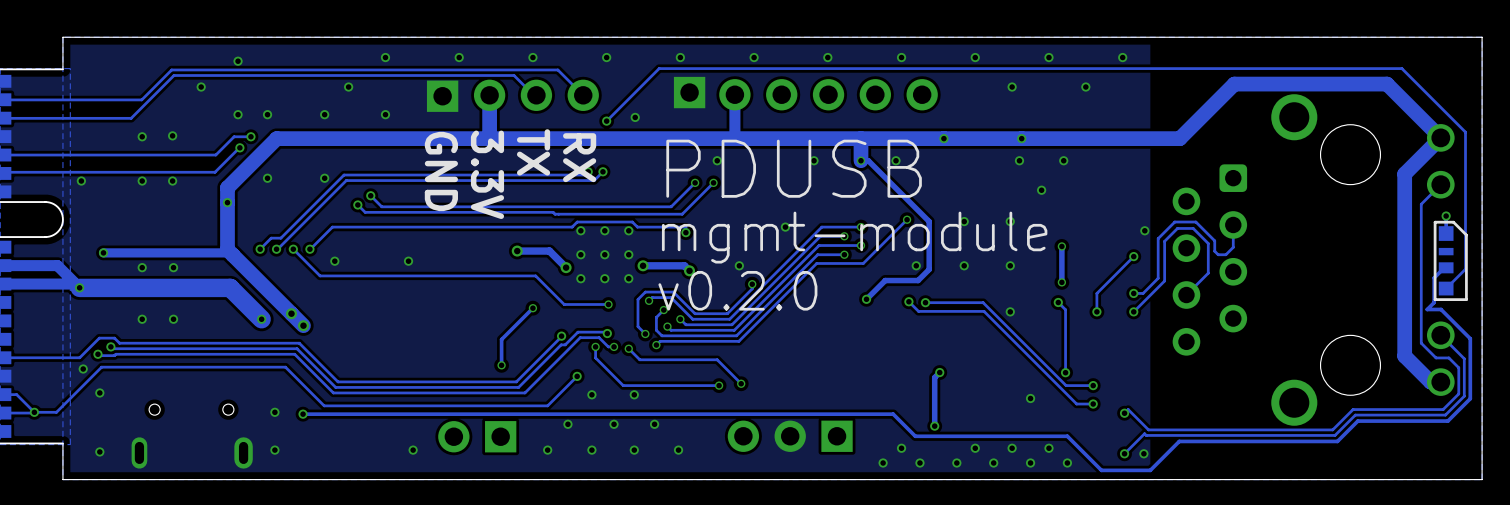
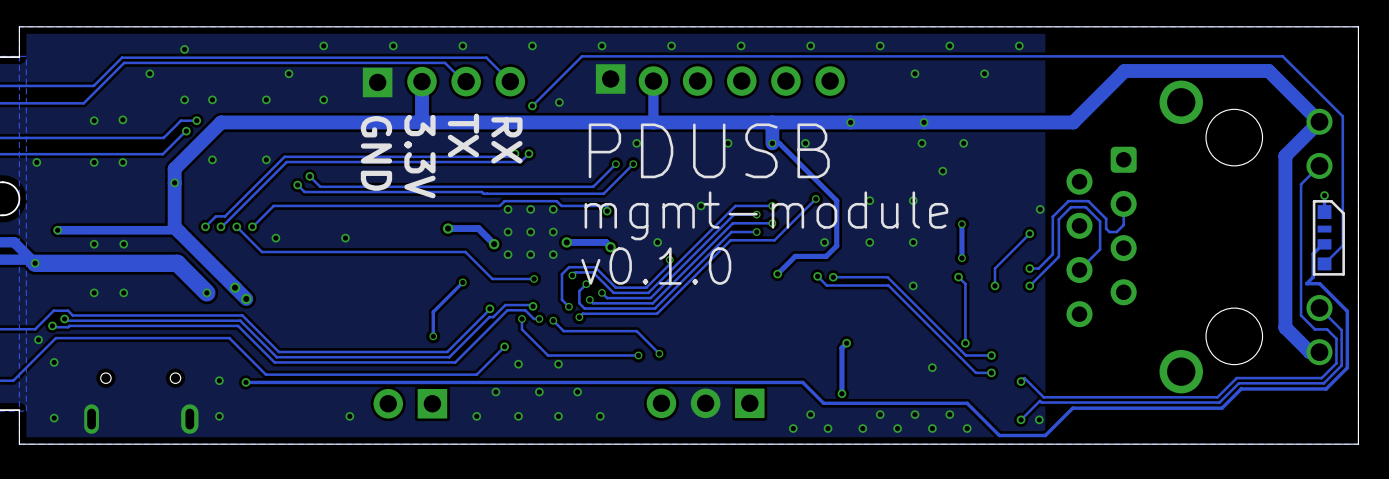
text: v0.2.0 (737, 290) -> v0.1.0 (656, 266)

